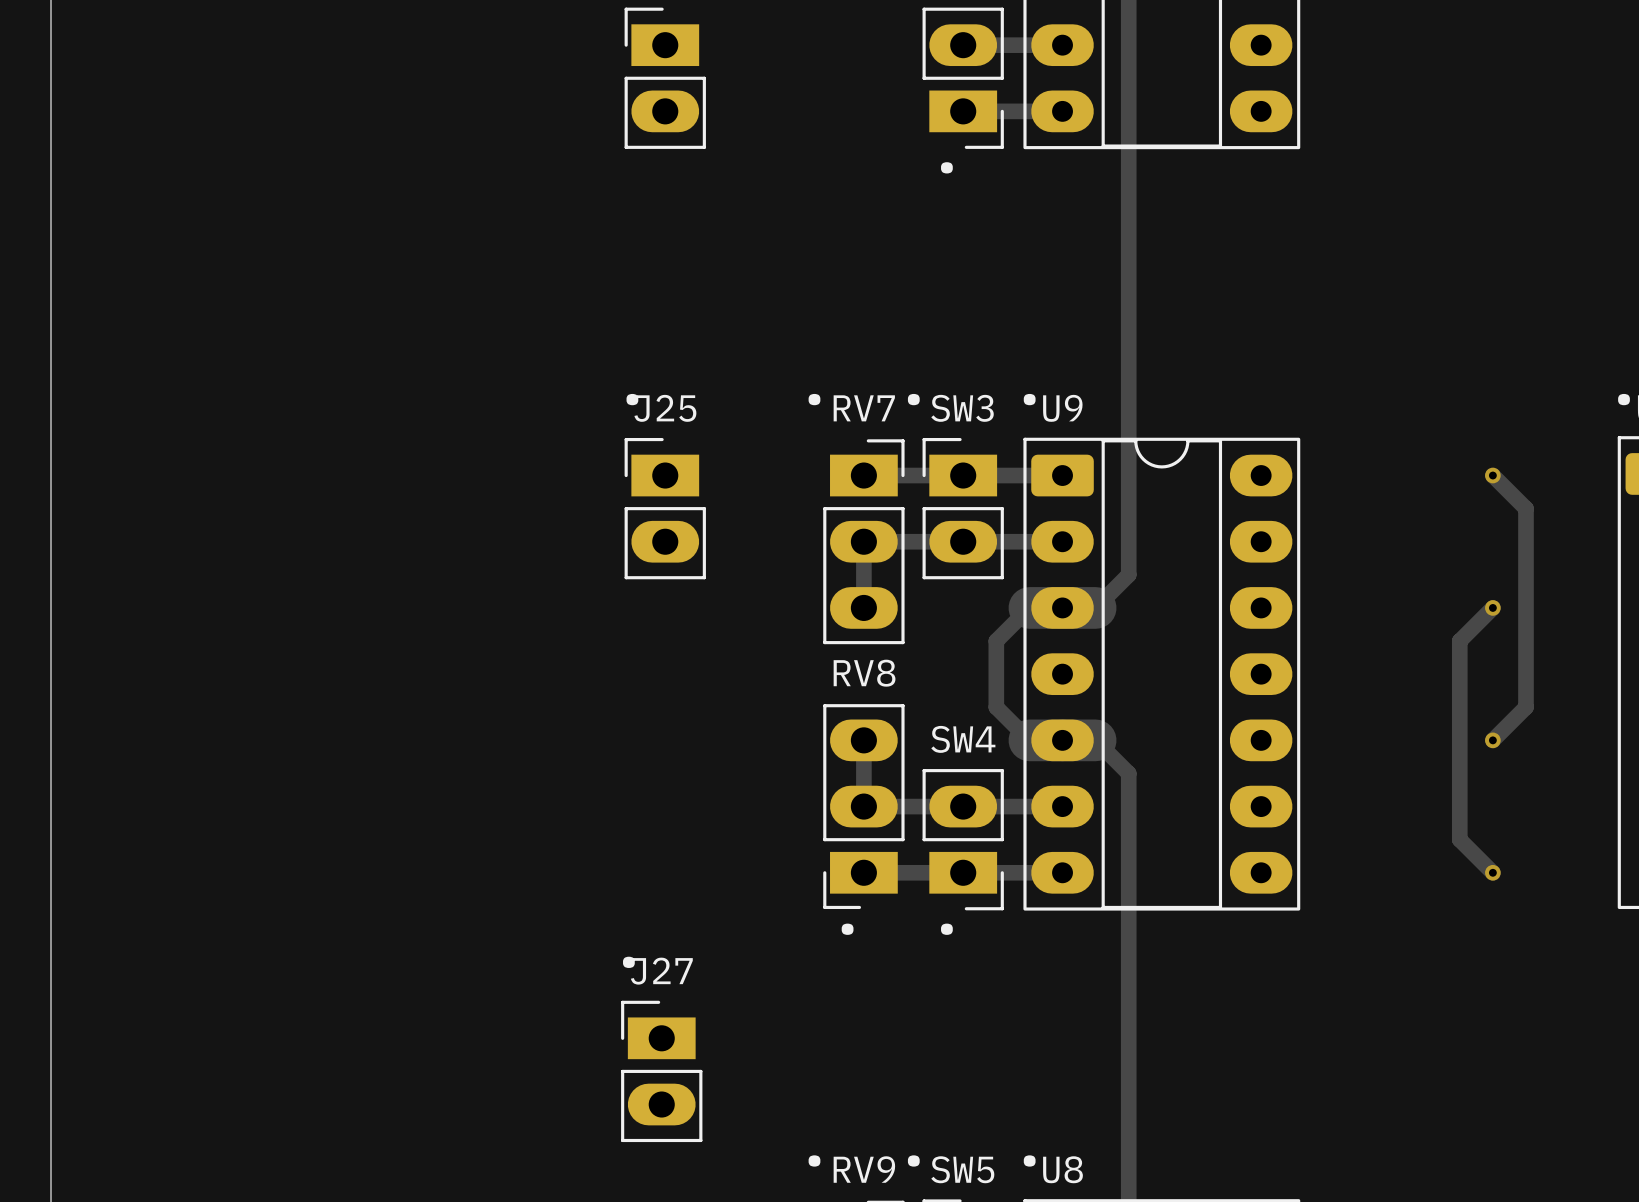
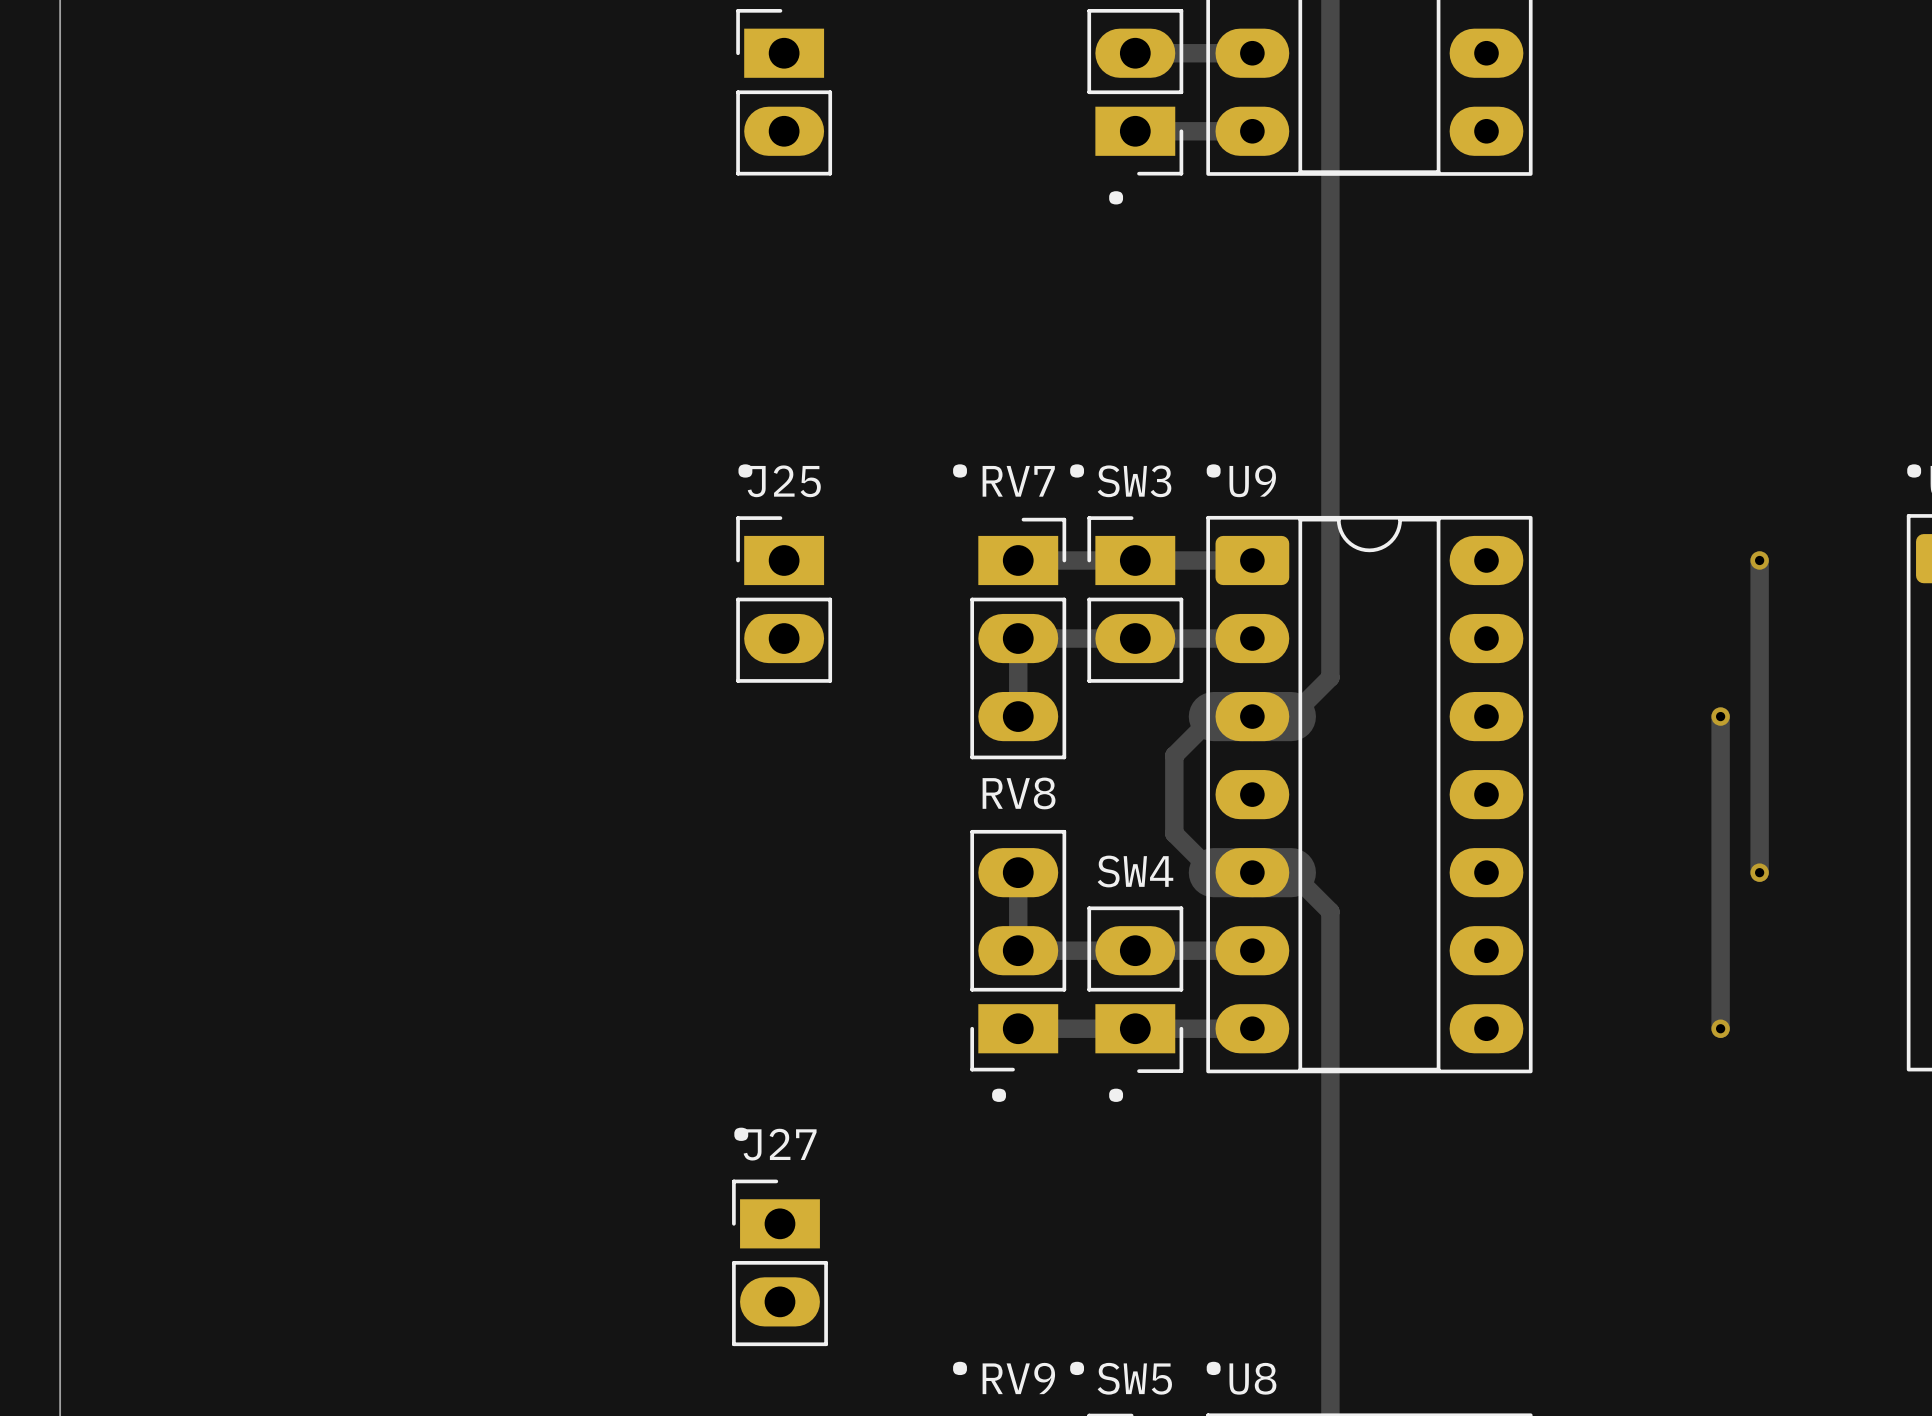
track: (1492, 475) (1525, 508) (1525, 707) (1492, 740) -> (1759, 560) (1759, 872)
track: (1492, 607) (1459, 641) -> (1720, 716) (1720, 755)
via position: (1492, 607) -> (1720, 716)
track: (1459, 839) (1492, 872) -> (1720, 989) (1720, 1028)
via position: (1492, 872) -> (1720, 1028)

